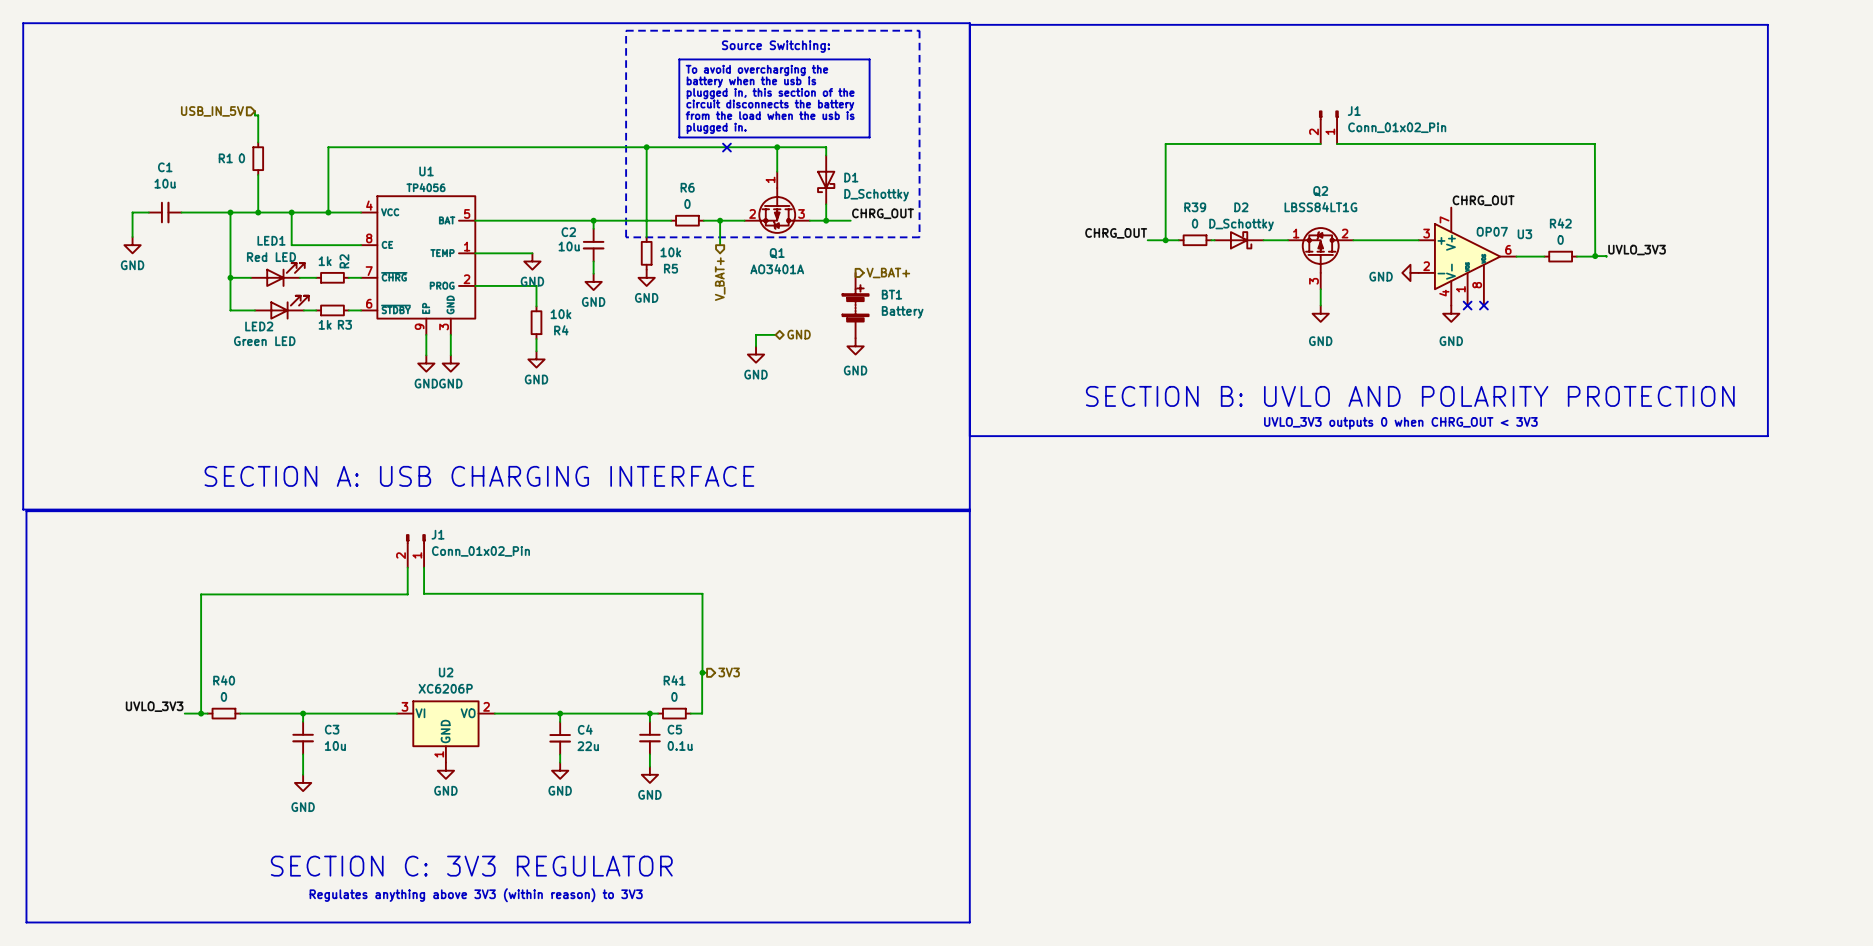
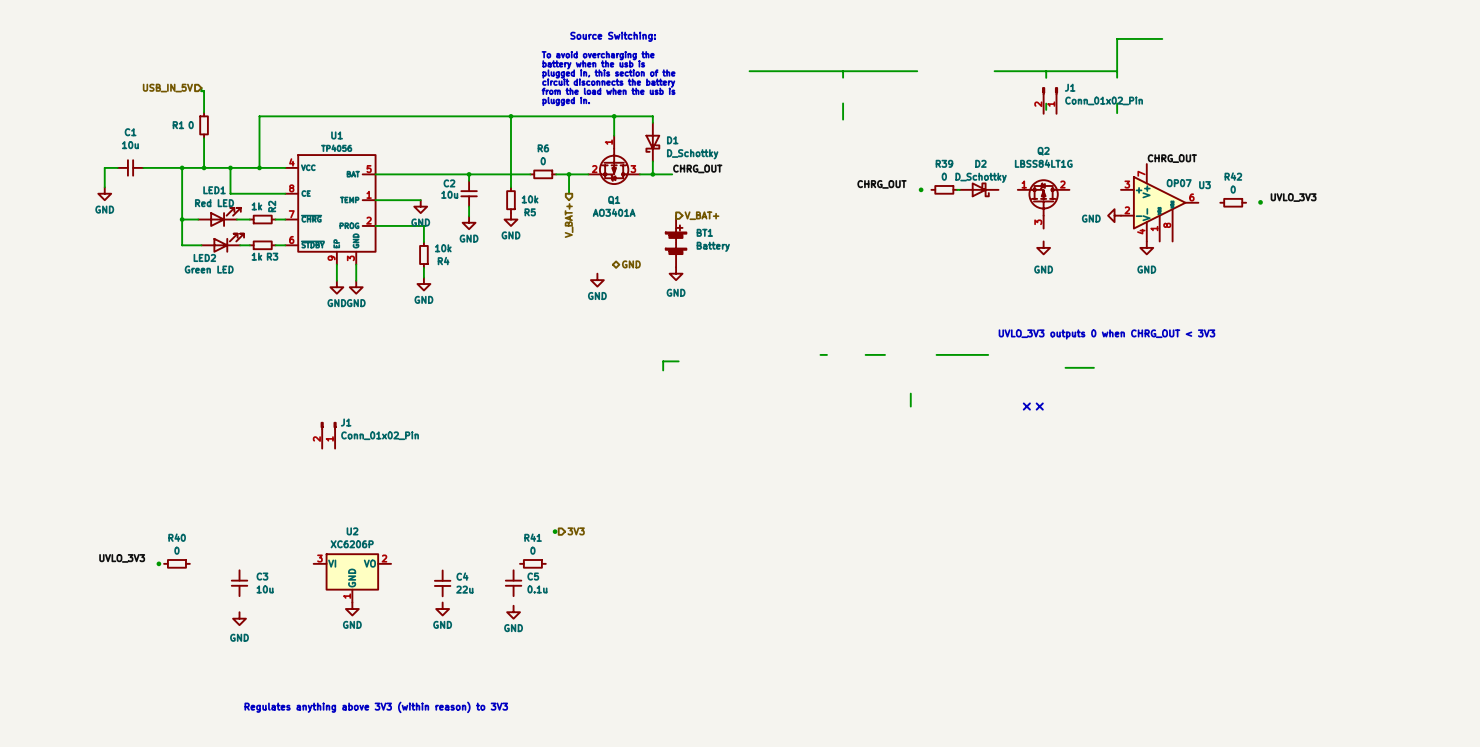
line: (23, 23) (969, 23) (969, 509) (23, 509) (23, 23) -> none
line: (969, 24) (1767, 24) (1767, 436) (969, 436) -> none
line: (626, 30) (919, 30) (919, 237) (626, 237) (626, 30) -> none
wire: none -> (1162, 38) (1117, 38) (1117, 77)
line: (679, 59) (869, 59) (869, 137) (679, 137) (679, 59) -> none
wire: none -> (749, 71) (917, 71)
wire: none -> (843, 71) (843, 77)
wire: none -> (994, 71) (1117, 71)
wire: none -> (1046, 71) (1046, 77)
wire: none -> (843, 103) (843, 119)
wire: none -> (1117, 103) (1117, 113)
wire: none -> (1046, 103) (1046, 109)
wire: (1320, 143) (1165, 143) (1165, 240) -> none
wire: (1337, 143) (1594, 143) (1595, 256) -> none
no-connect mark: (726, 147) -> none
wire: (1147, 240) (1178, 240) -> none
wire: (1263, 240) (1288, 240) -> none
wire: (1353, 240) (1418, 240) -> none
wire: (1516, 256) (1544, 256) -> none
wire: (1595, 256) (1606, 256) -> none
wire: (1595, 256) (1576, 256) -> none
wire: (1320, 289) (1320, 305) -> none
no-connect mark: (1467, 305) -> none
no-connect mark: (1483, 305) -> none
wire: (775, 334) (756, 334) (756, 346) -> (678, 361) (663, 361) (663, 370)
text: SECTION B: UVLO AND POLARITY PROTECTION (1410, 396) -> none
wire: none -> (820, 354) (826, 354)
wire: none -> (865, 354) (884, 354)
wire: none -> (936, 354) (988, 354)
wire: none -> (1065, 367) (1093, 367)
text: SECTION A: USB CHARGING INTERFACE (479, 476) -> none
wire: none -> (910, 393) (910, 406)
line: (26, 511) (969, 511) (969, 922) (26, 922) (26, 511) -> none
no-connect mark: none -> (1026, 406)
no-connect mark: none -> (1039, 406)
wire: (407, 567) (407, 594) (201, 594) (201, 713) -> none
wire: (424, 567) (424, 593) (702, 593) (702, 672) -> none
wire: (707, 672) (702, 672) (702, 713) (690, 713) -> none
wire: (184, 713) (207, 713) -> none
wire: (240, 713) (396, 713) -> none
wire: (303, 713) (303, 721) -> none
junction: (303, 713) -> none
wire: (494, 713) (658, 713) -> none
wire: (560, 713) (560, 721) -> none
junction: (560, 713) -> none
wire: (649, 713) (649, 721) -> none
junction: (649, 713) -> none
wire: (303, 754) (303, 774) -> none
wire: (560, 754) (560, 762) -> none
wire: (649, 754) (649, 766) -> none
text: SECTION C: 3V3 REGULATOR (471, 866) -> none

